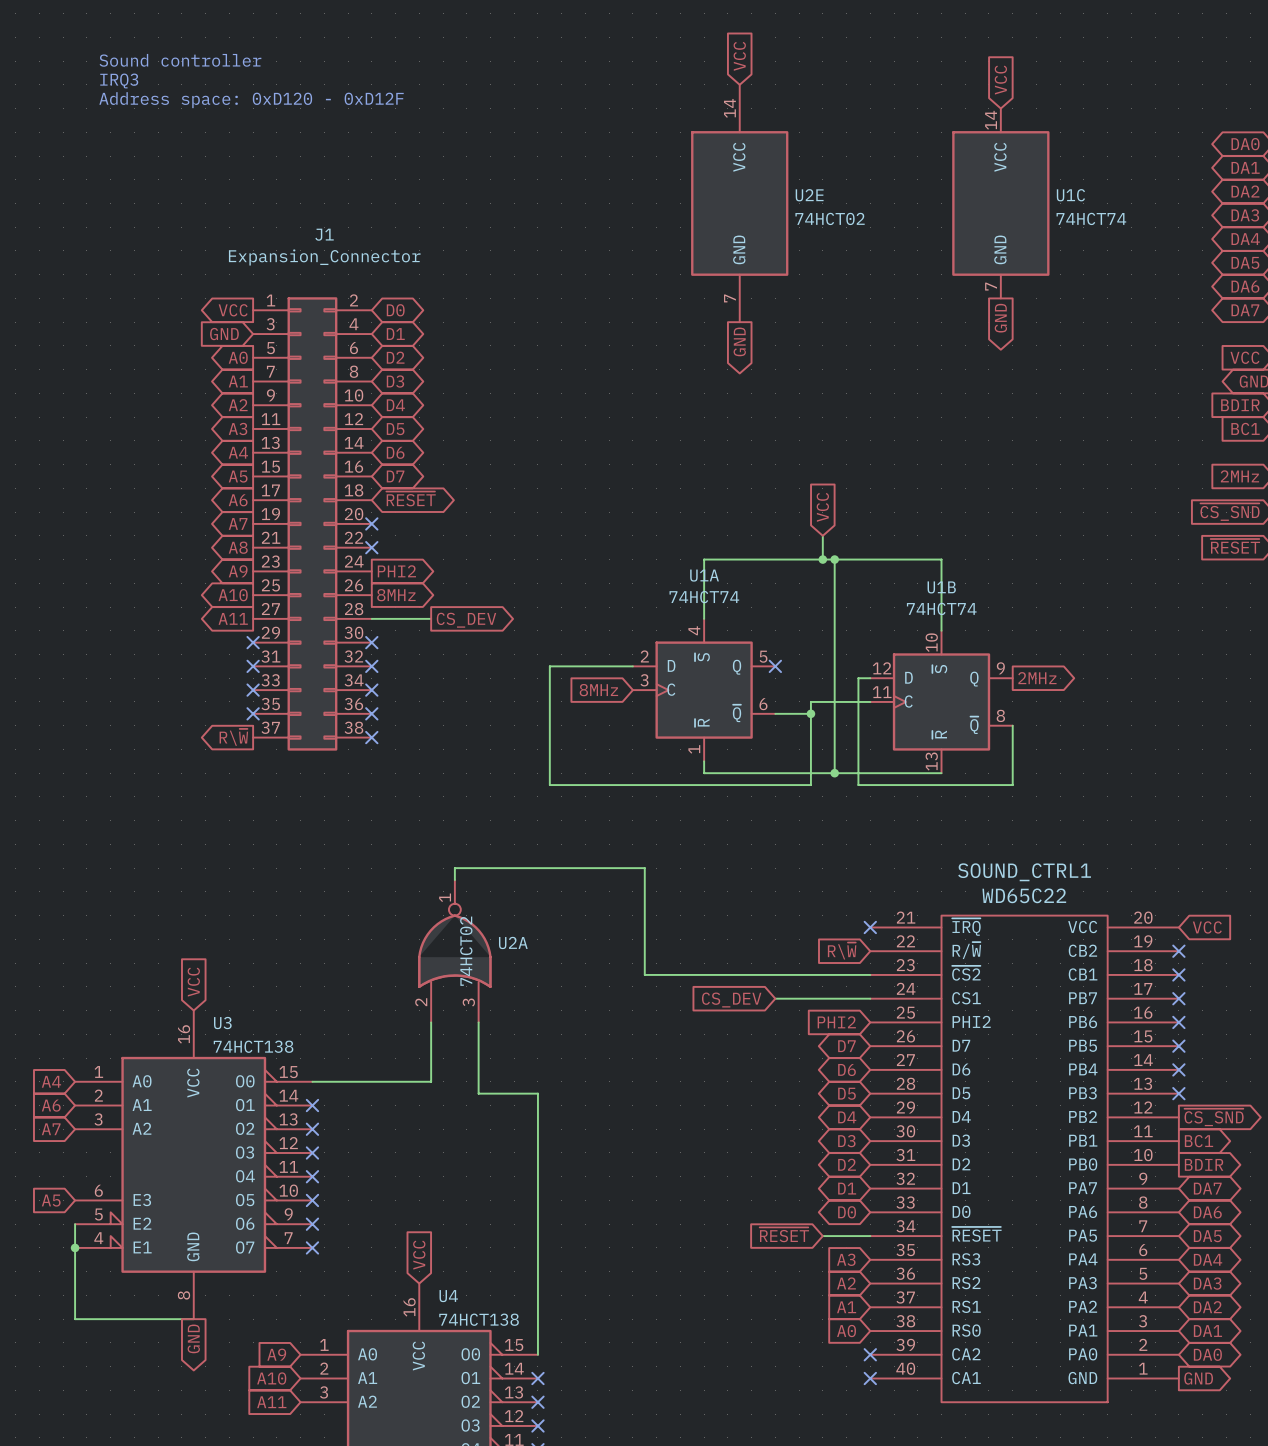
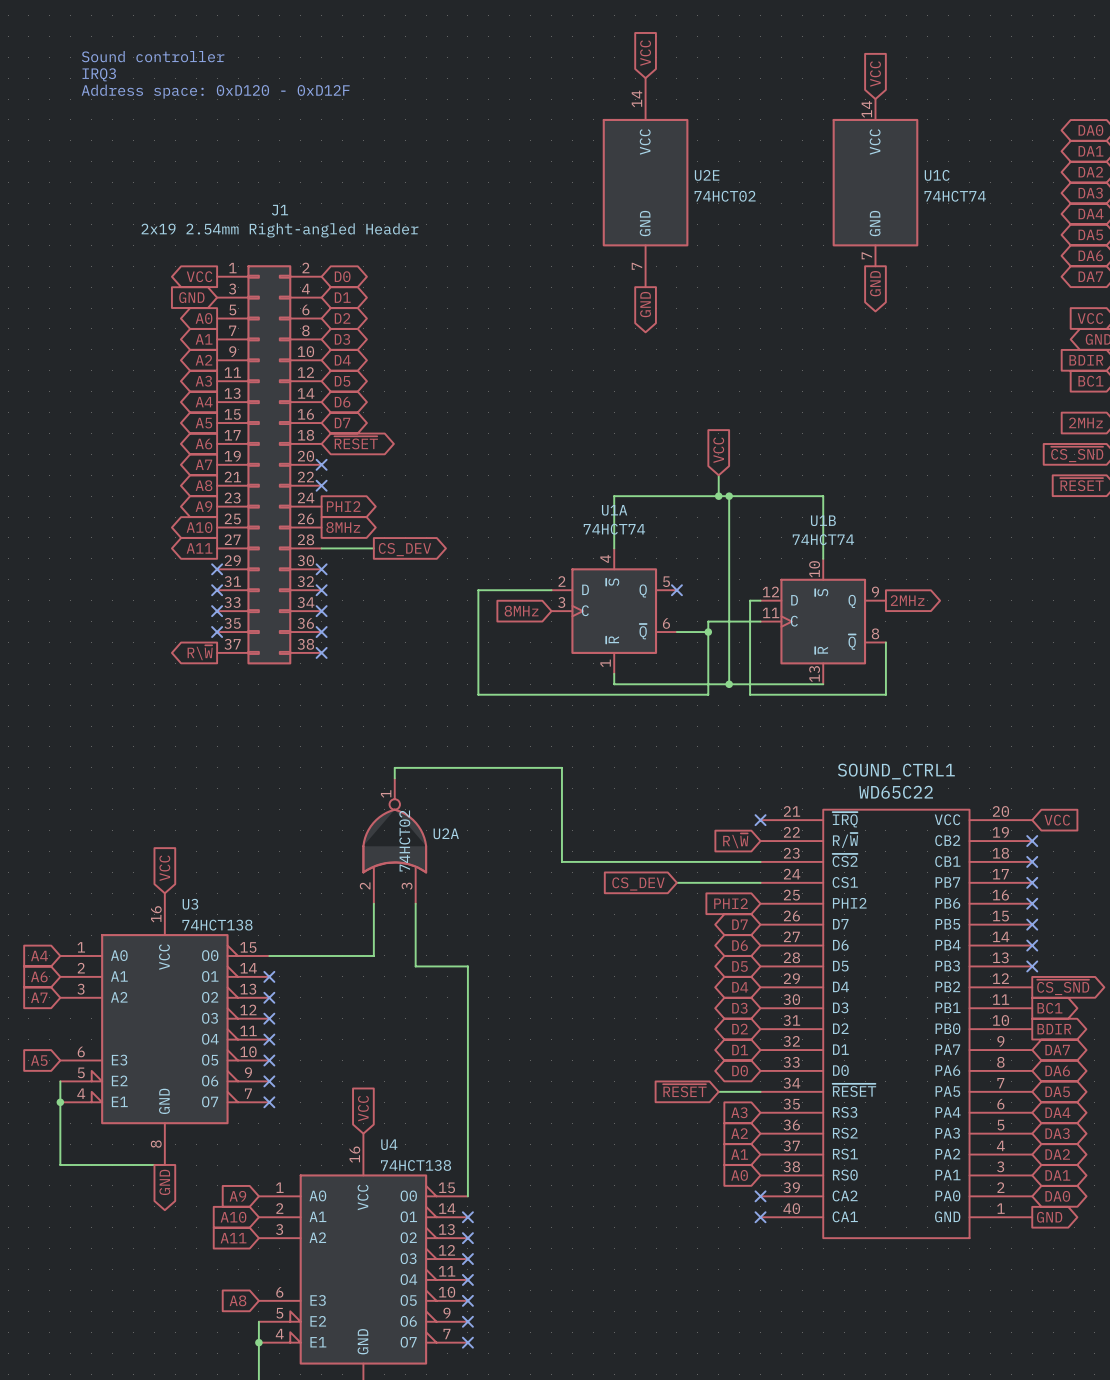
J1 value: Expansion_Connector (324, 257) -> 2x19 2.54mm Right-angled Header (279, 230)

